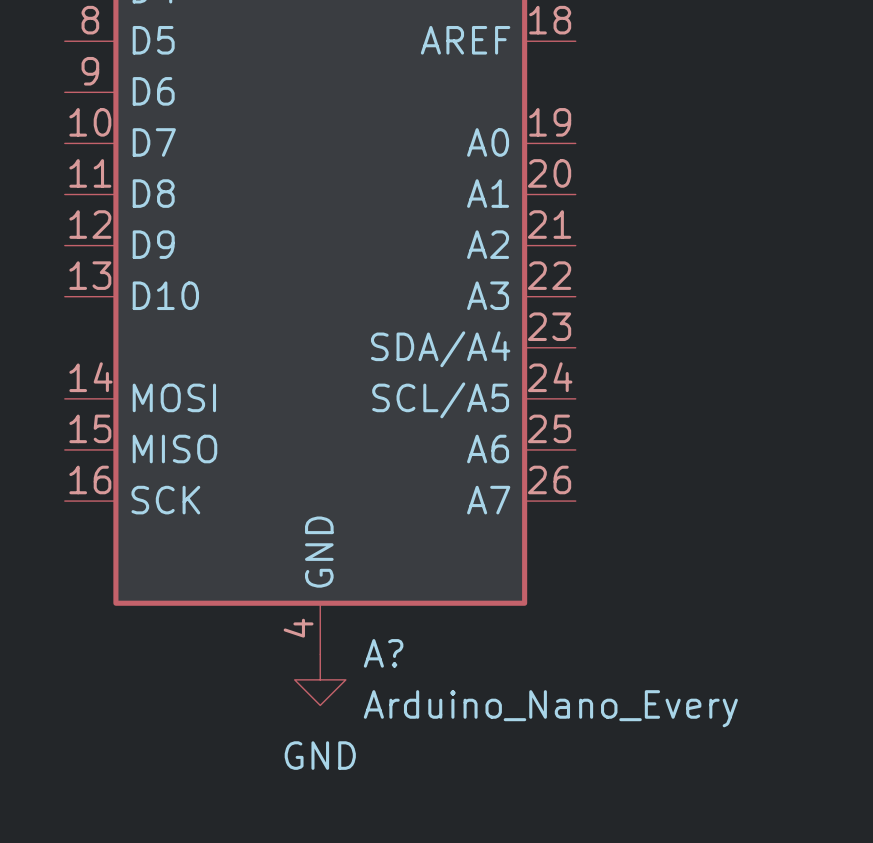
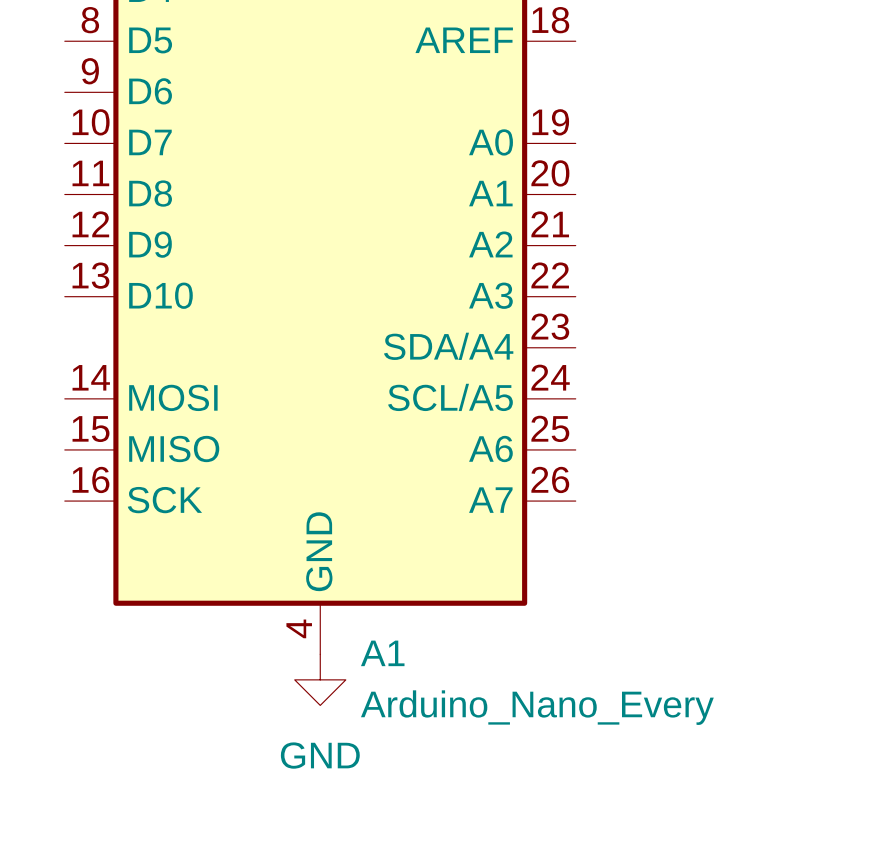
A? name: A? (383, 653) -> A1 (382, 653)

